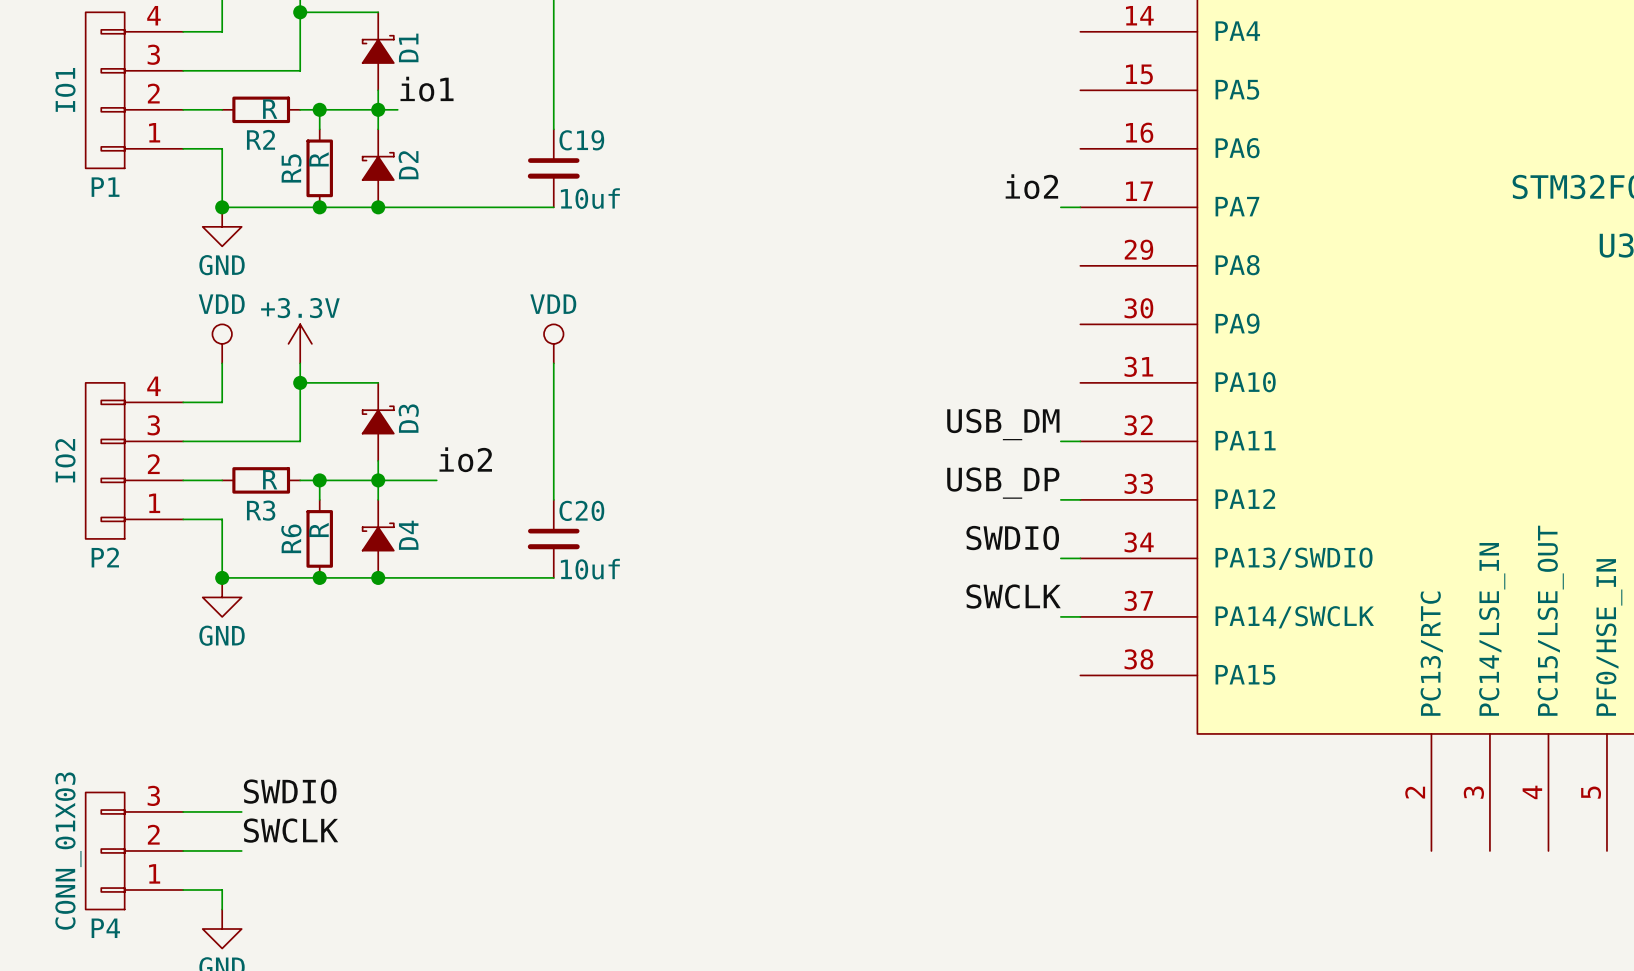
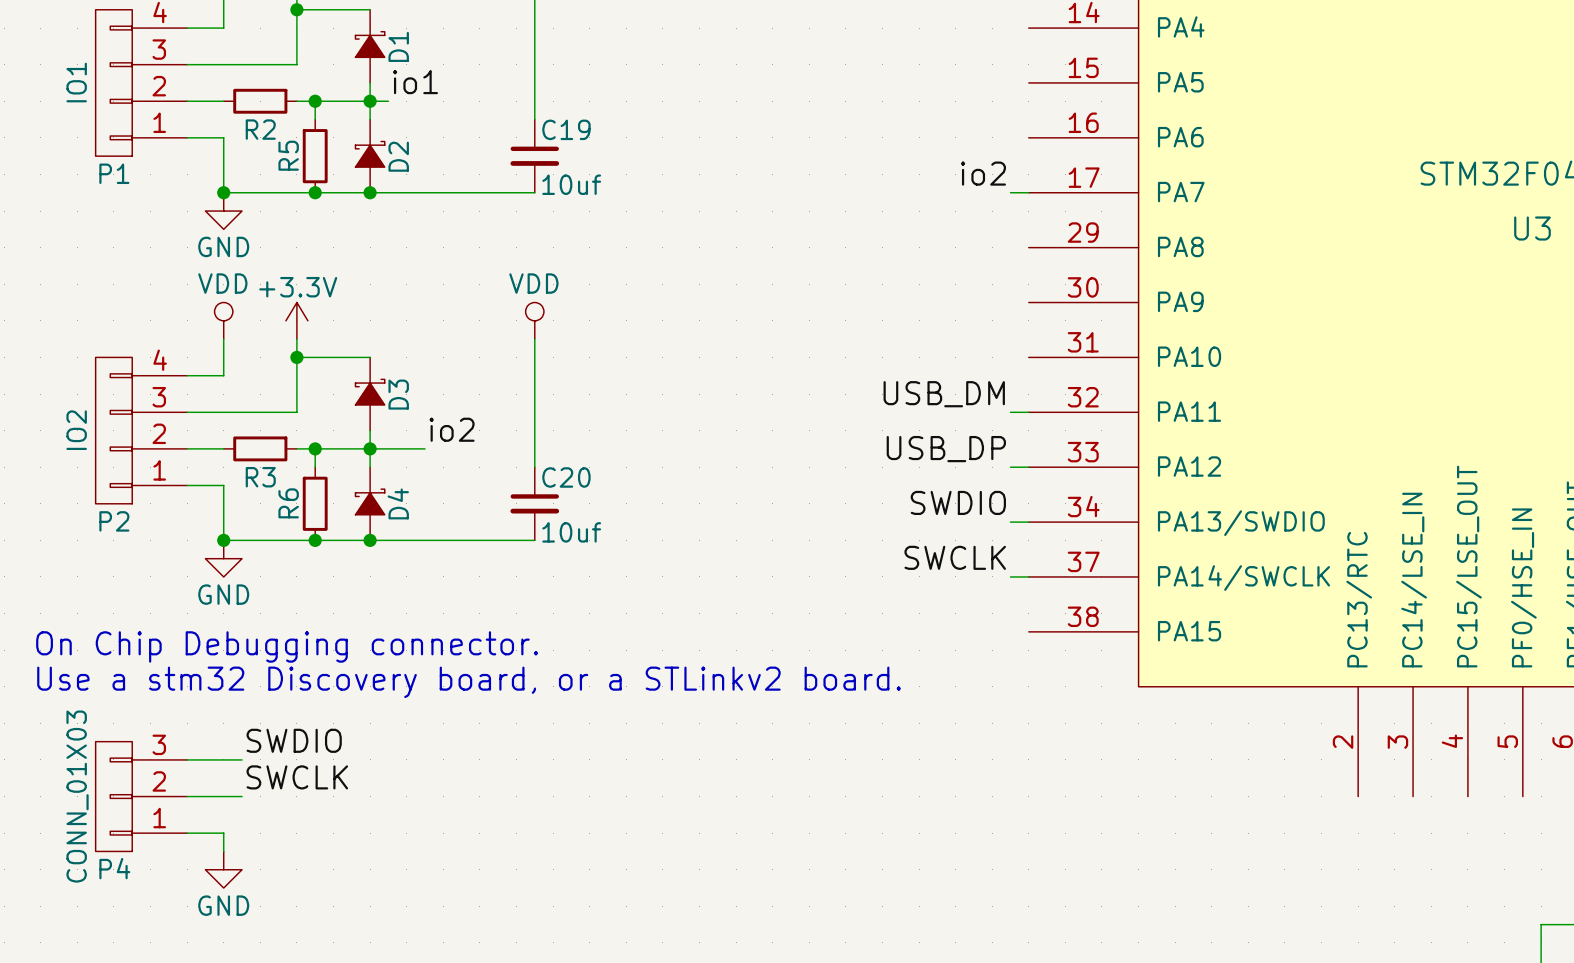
R2 value: R (270, 109) -> none
R5 value: R (318, 159) -> none
R3 value: R (270, 479) -> none
R6 value: R (318, 529) -> none
text: none -> On Chip Debugging connector. (287, 646)
text: none -> Use a stm32 Discovery board, or a STLinkv2 board. (469, 682)

